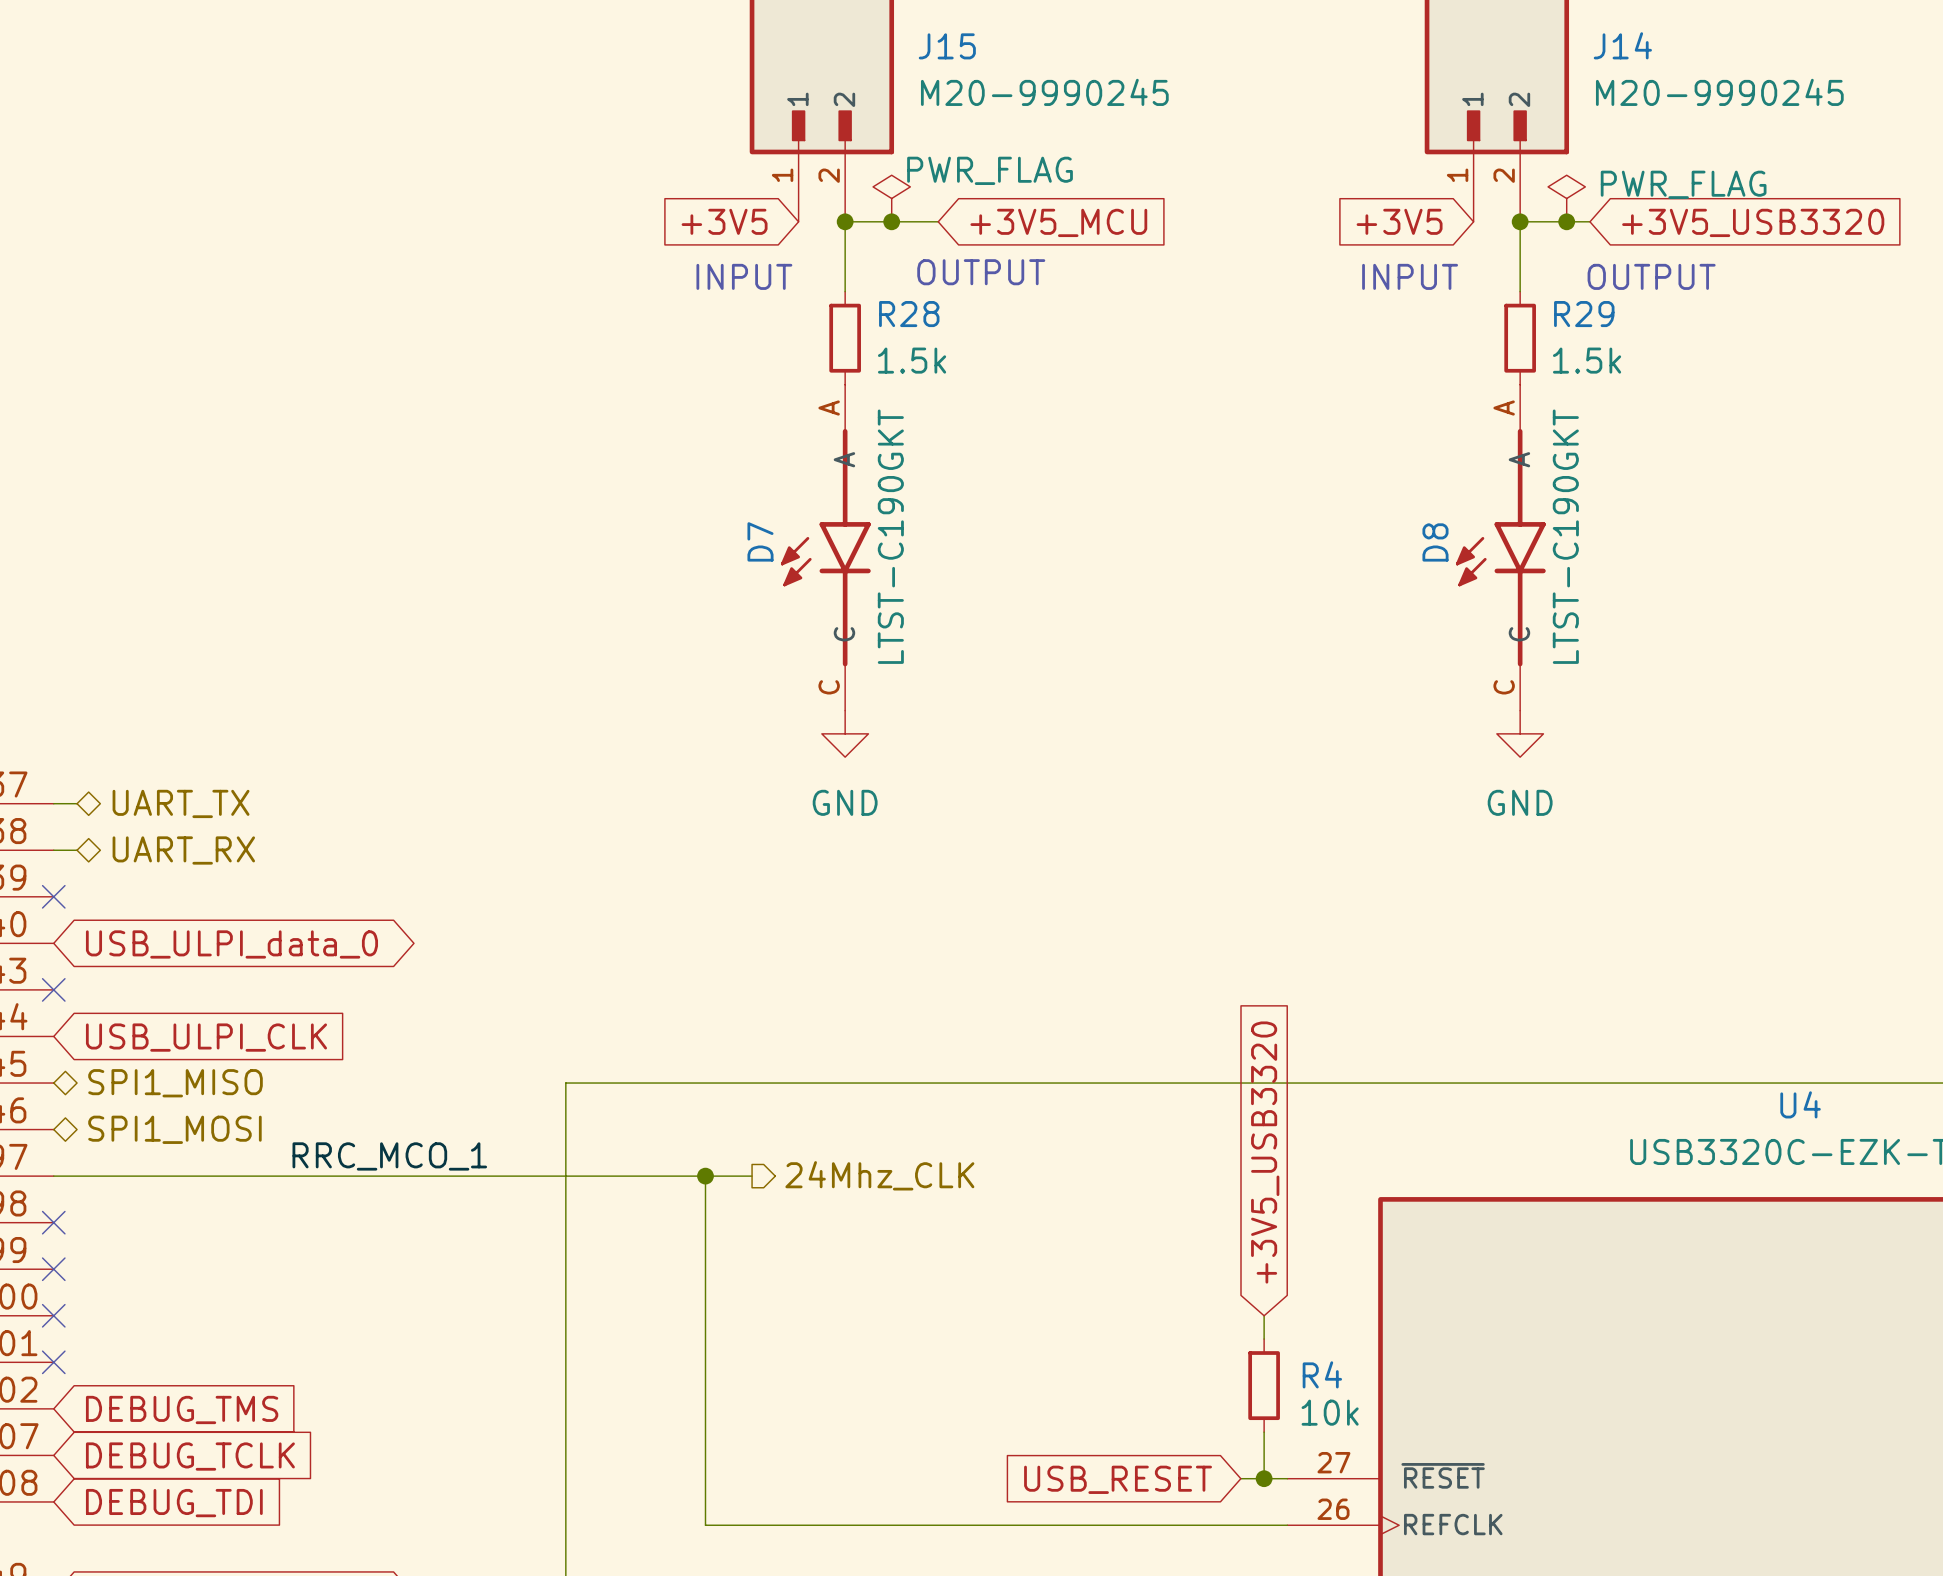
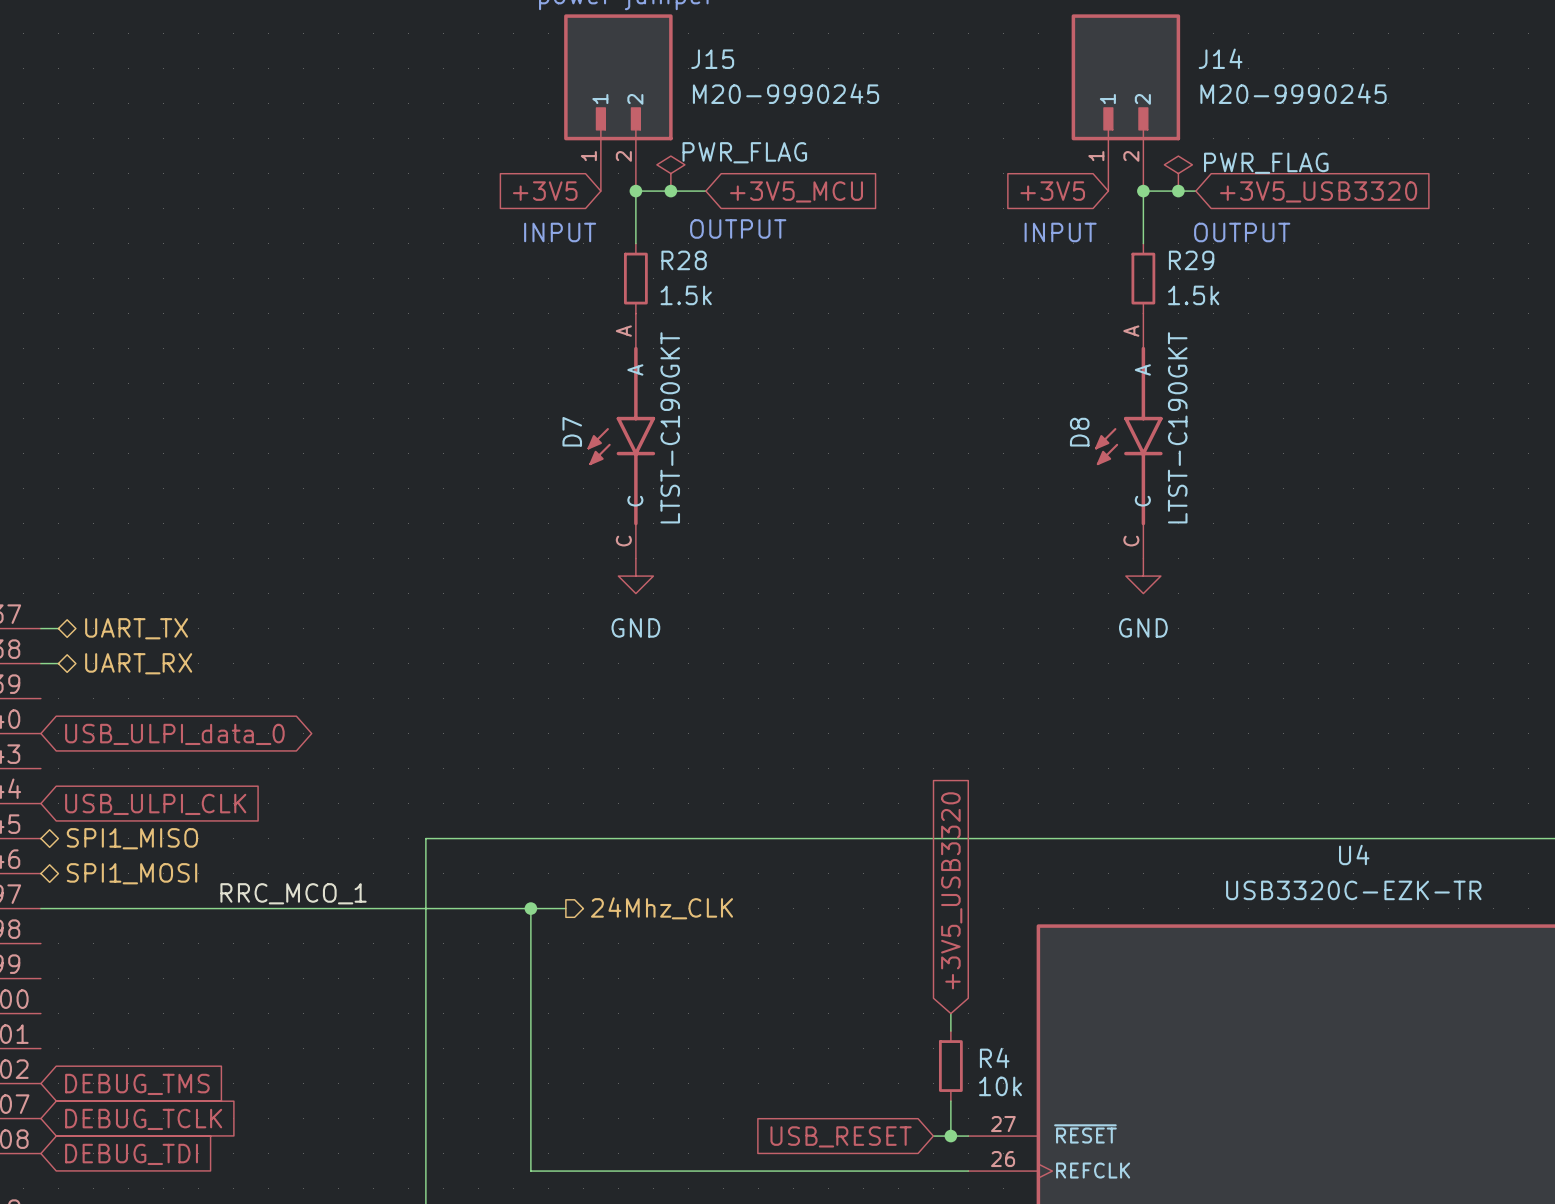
no-connect mark: (53, 896) -> none
no-connect mark: (53, 989) -> none
no-connect mark: (53, 1222) -> none
no-connect mark: (53, 1269) -> none
no-connect mark: (53, 1315) -> none
no-connect mark: (53, 1362) -> none

